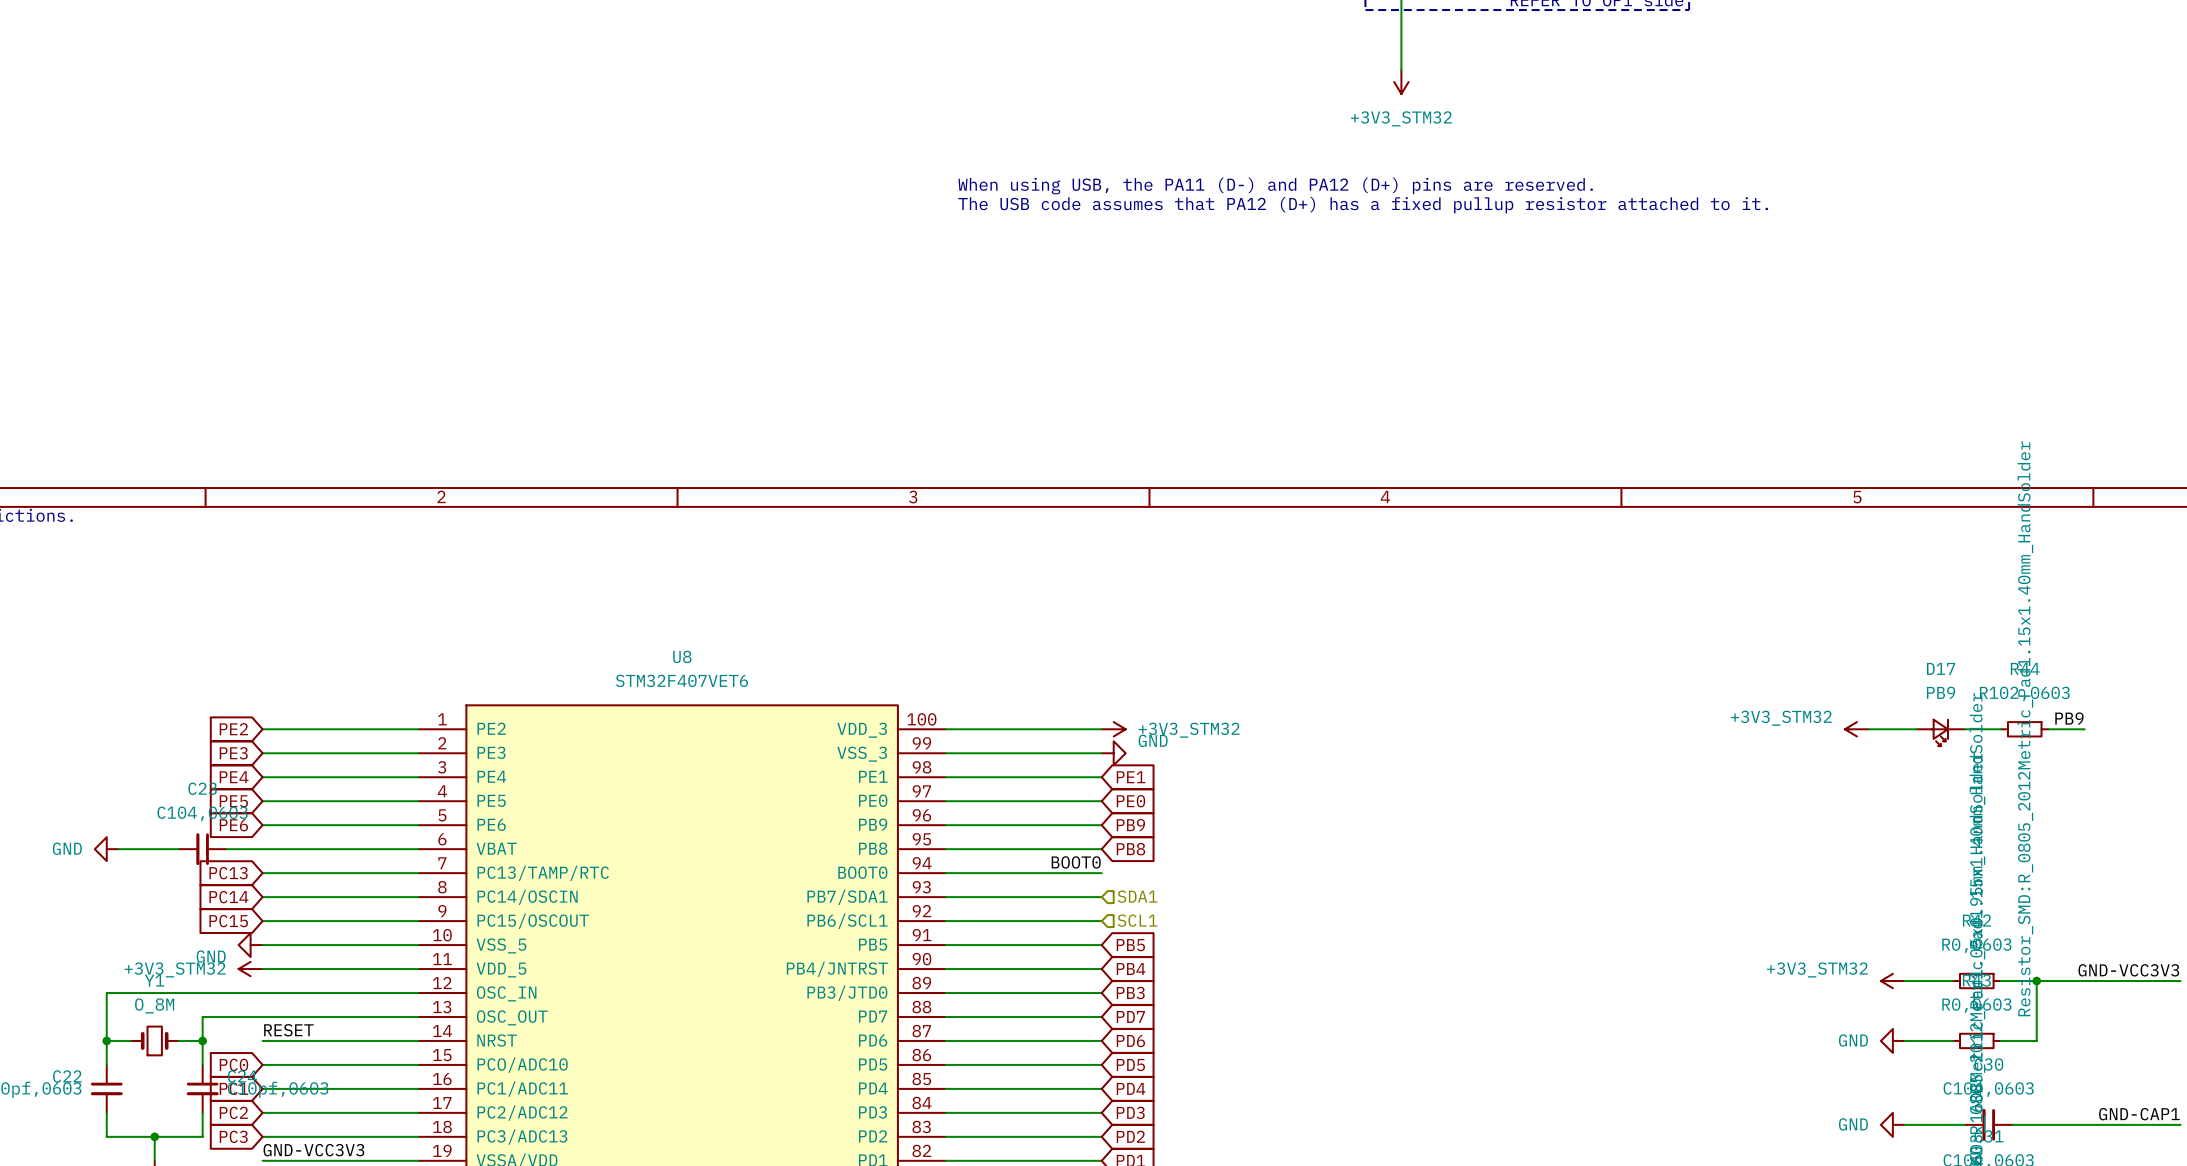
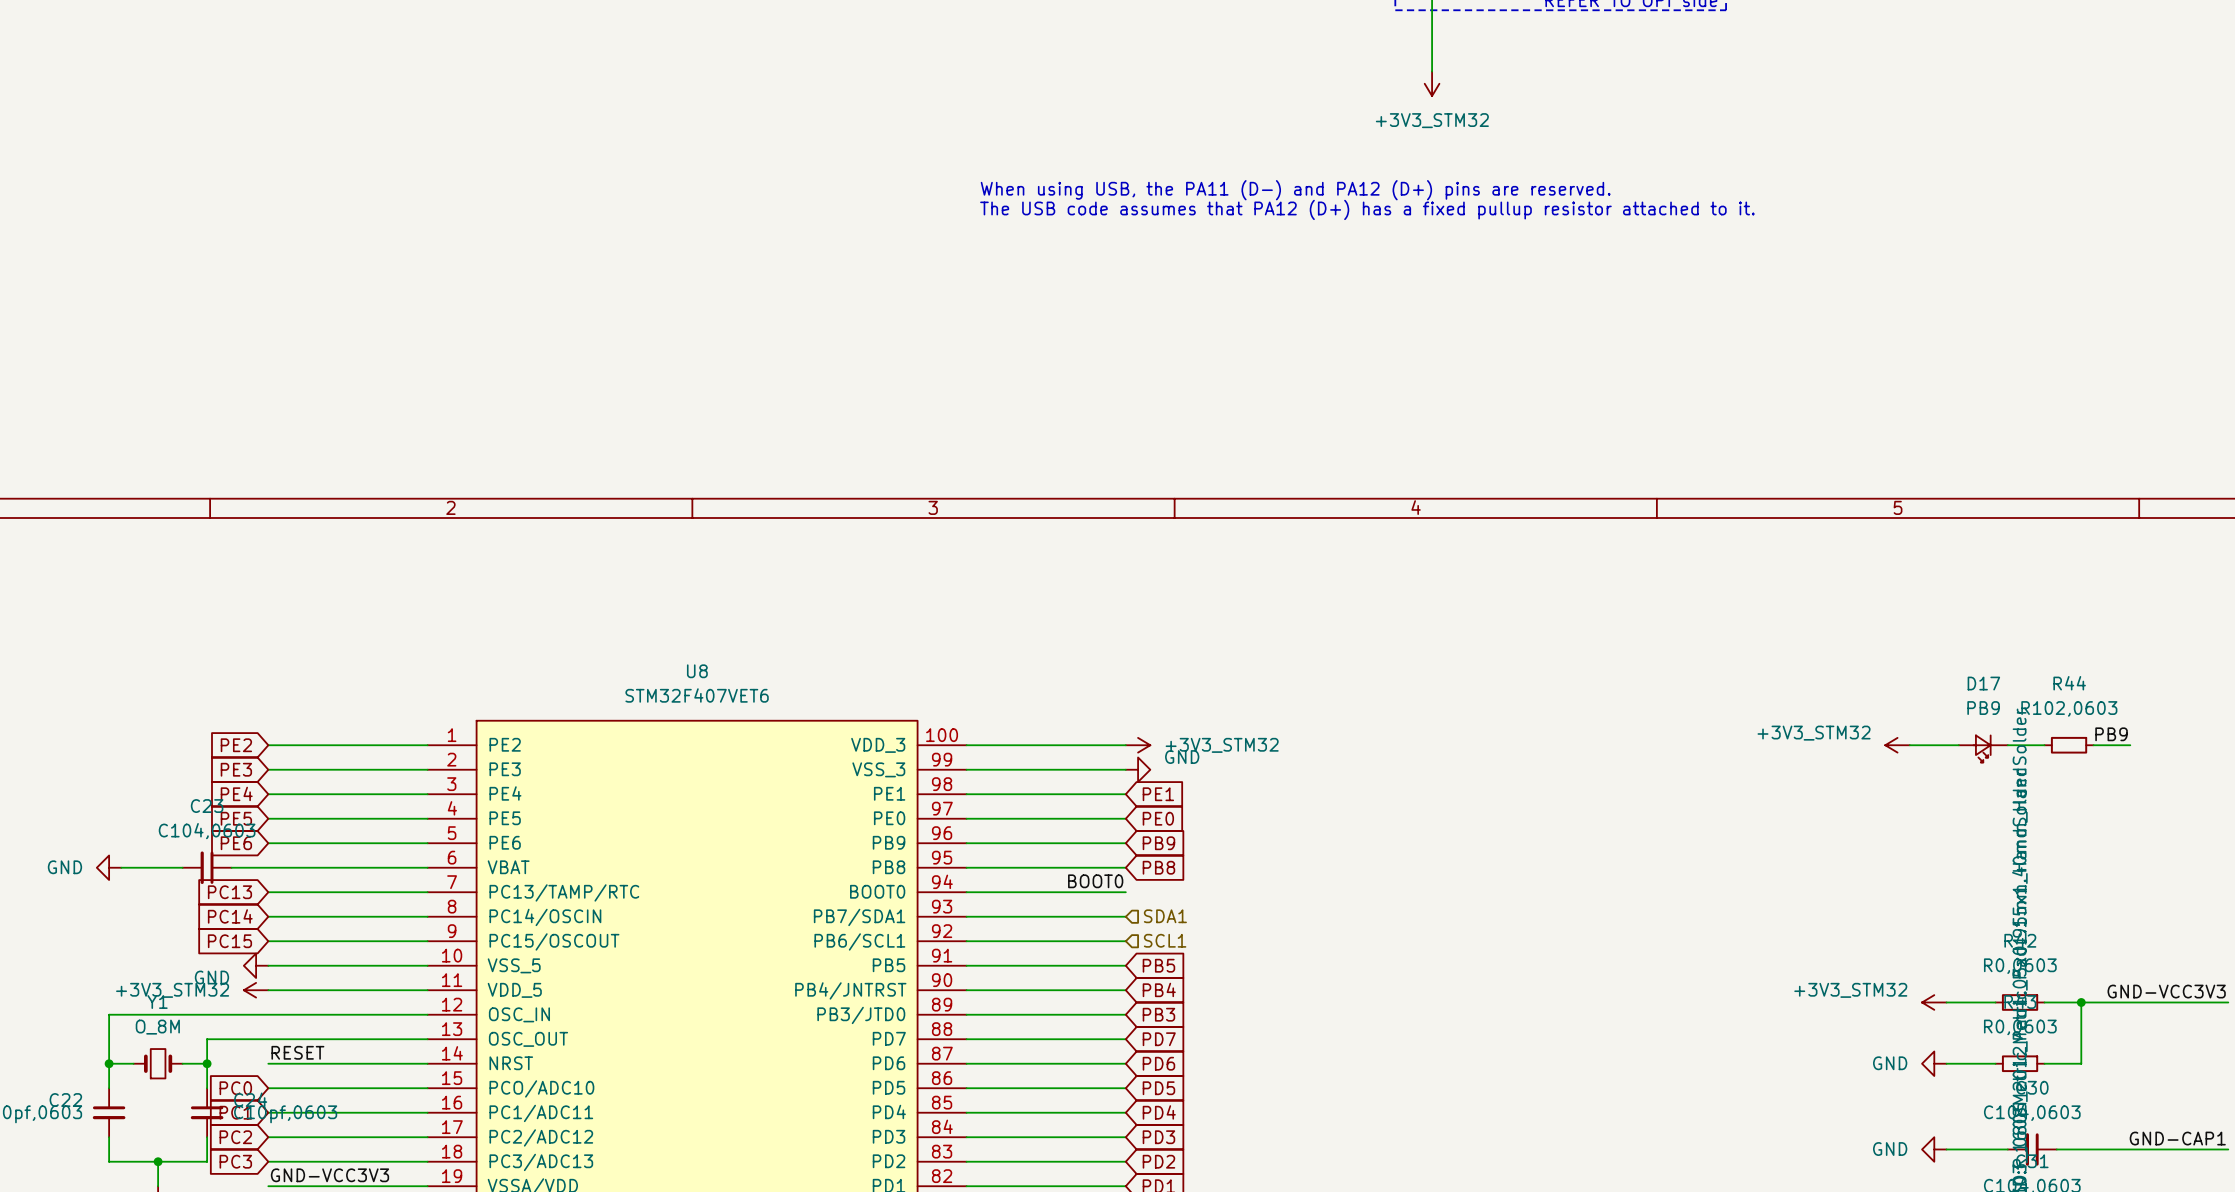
R44 text: Resistor_SMD:R_0805_2012Metric_Pad1.15x1.40mm_HandSolder (2025, 728) -> none

